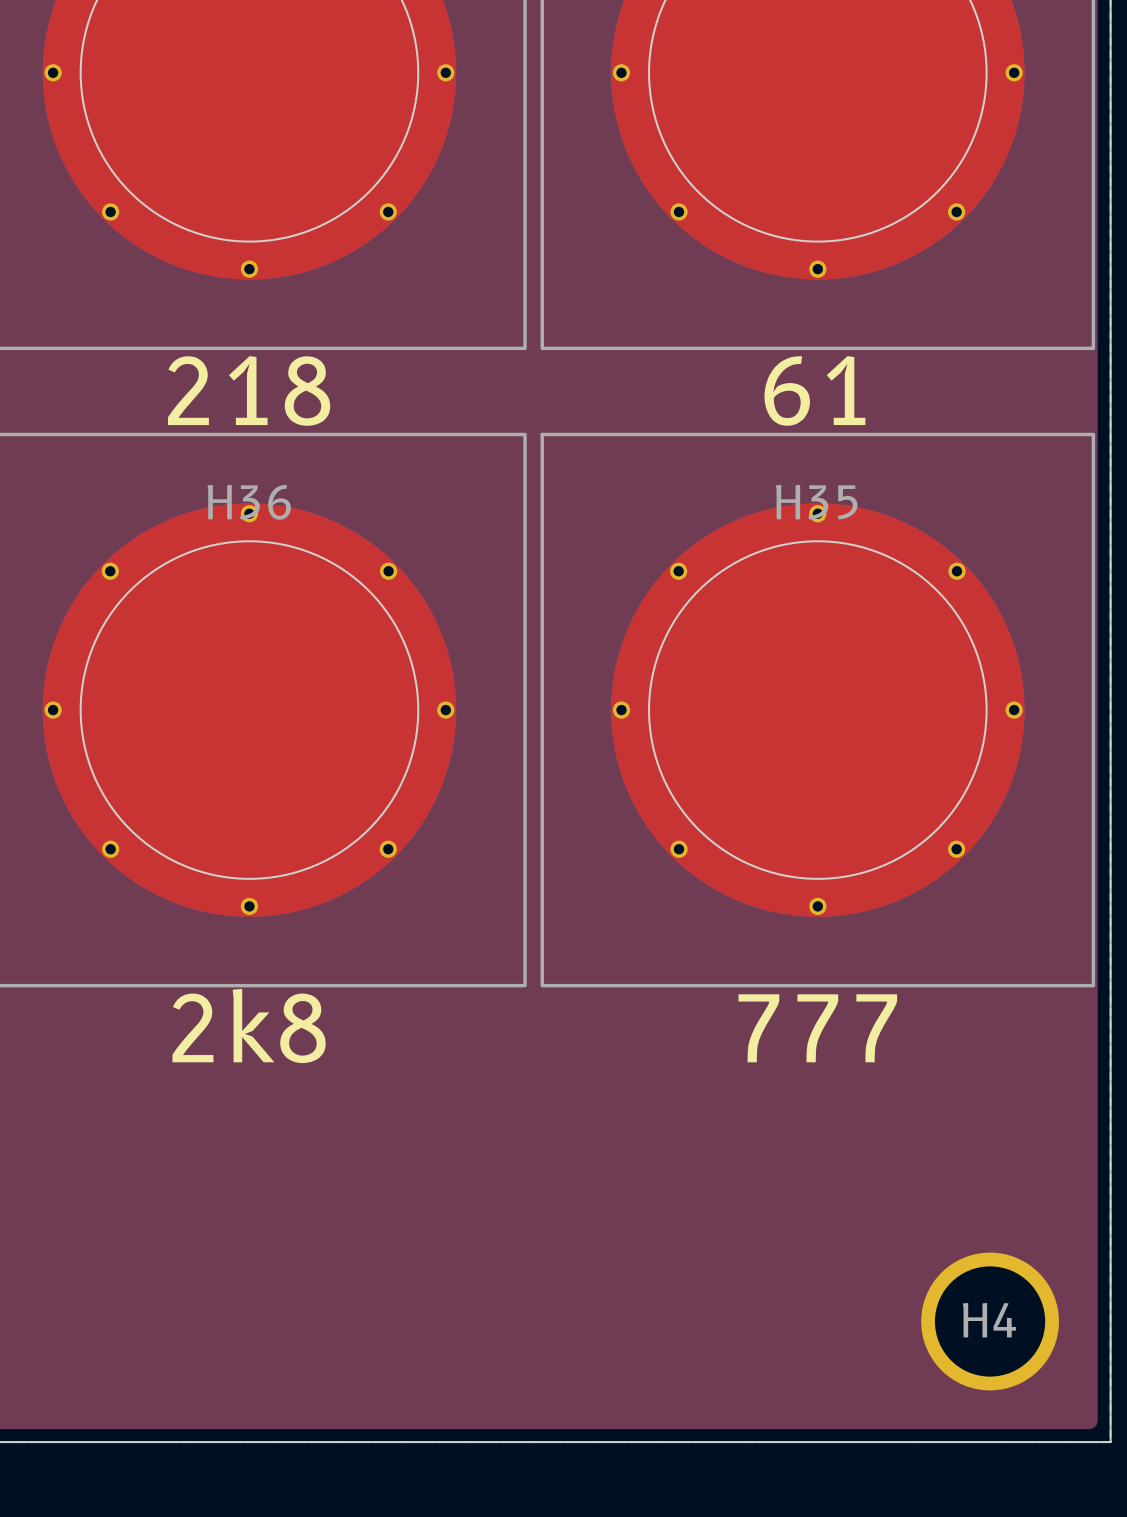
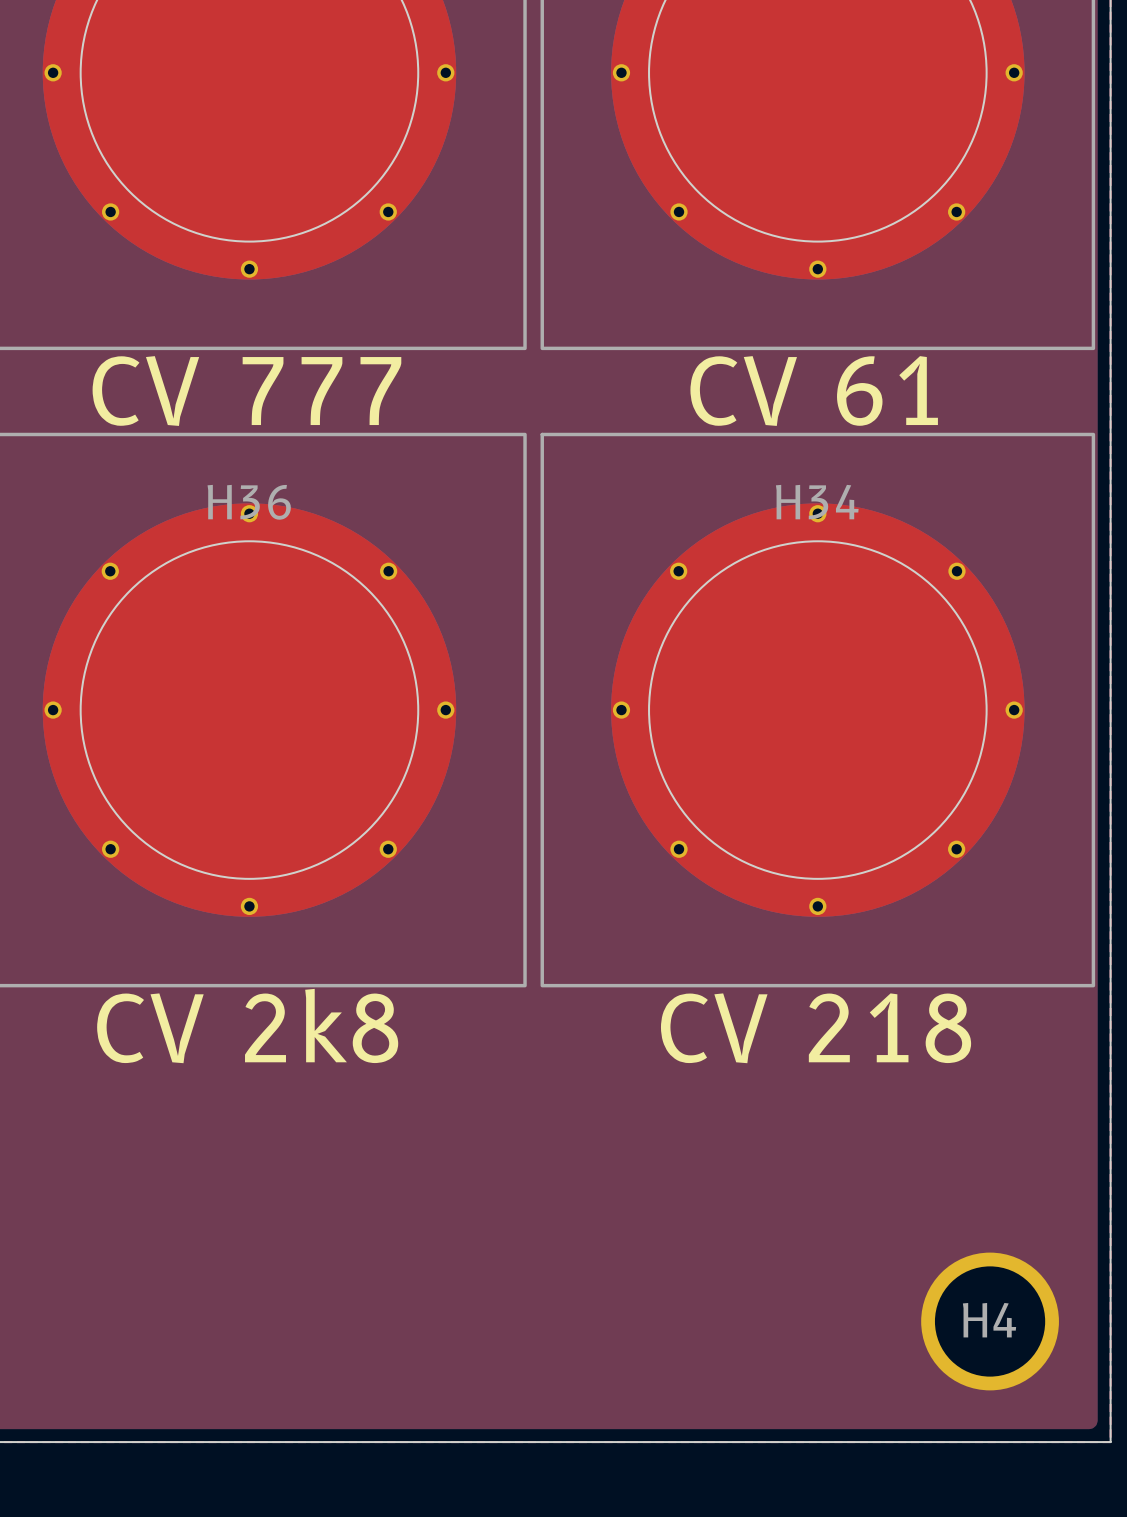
part value: 218 (249, 390) -> CV 777 (246, 391)
part value: 61 (814, 390) -> CV 61 (814, 391)
H35 name: H35 (816, 502) -> H34 (817, 502)
H36 value: 2k8 (249, 1025) -> CV 2k8 (247, 1026)
H35 value: 777 (817, 1028) -> CV 218 (816, 1028)

